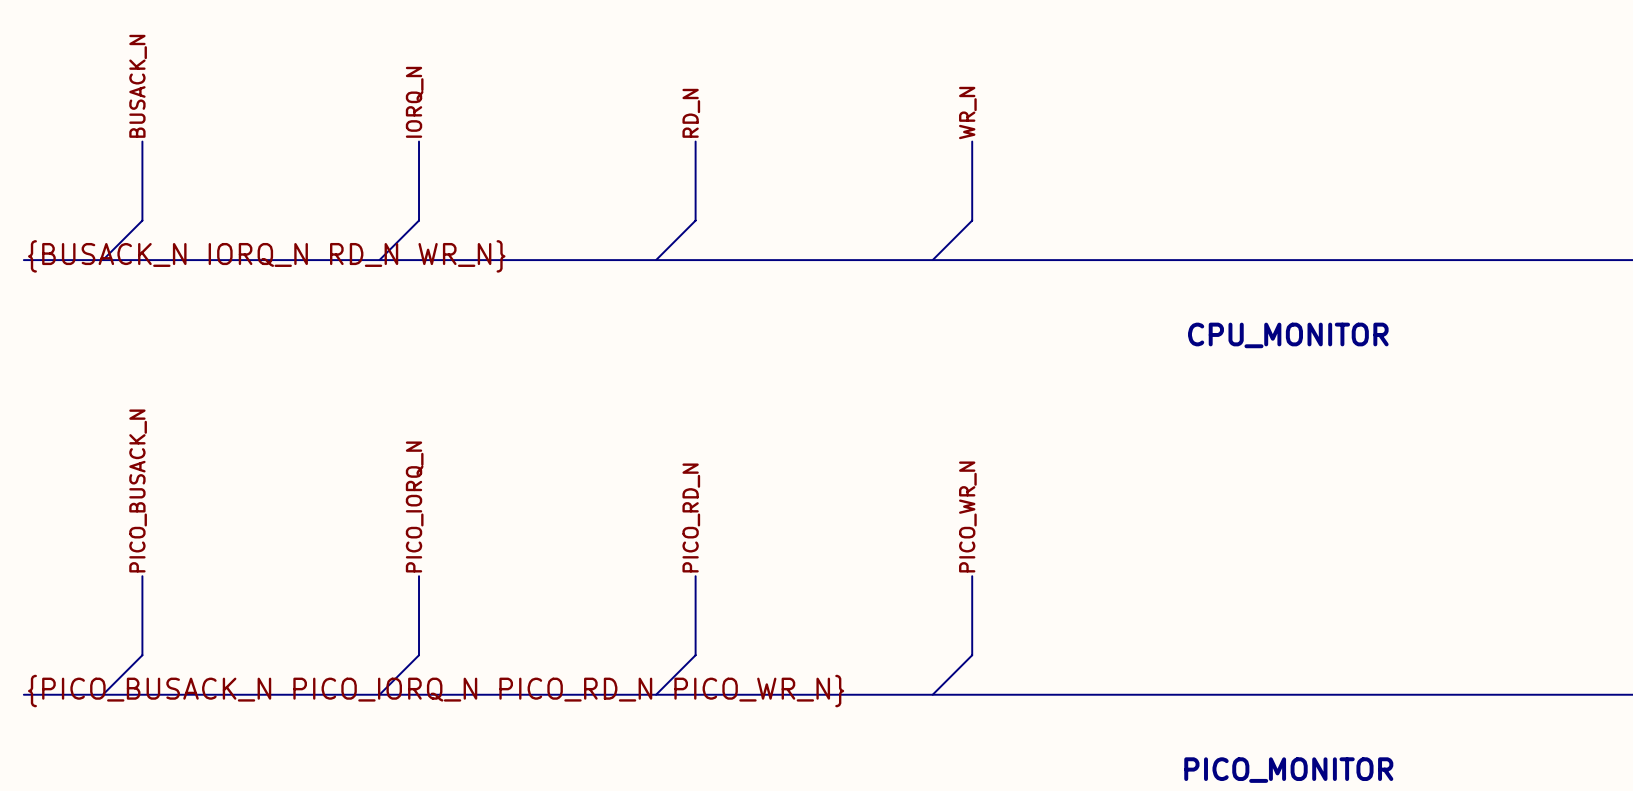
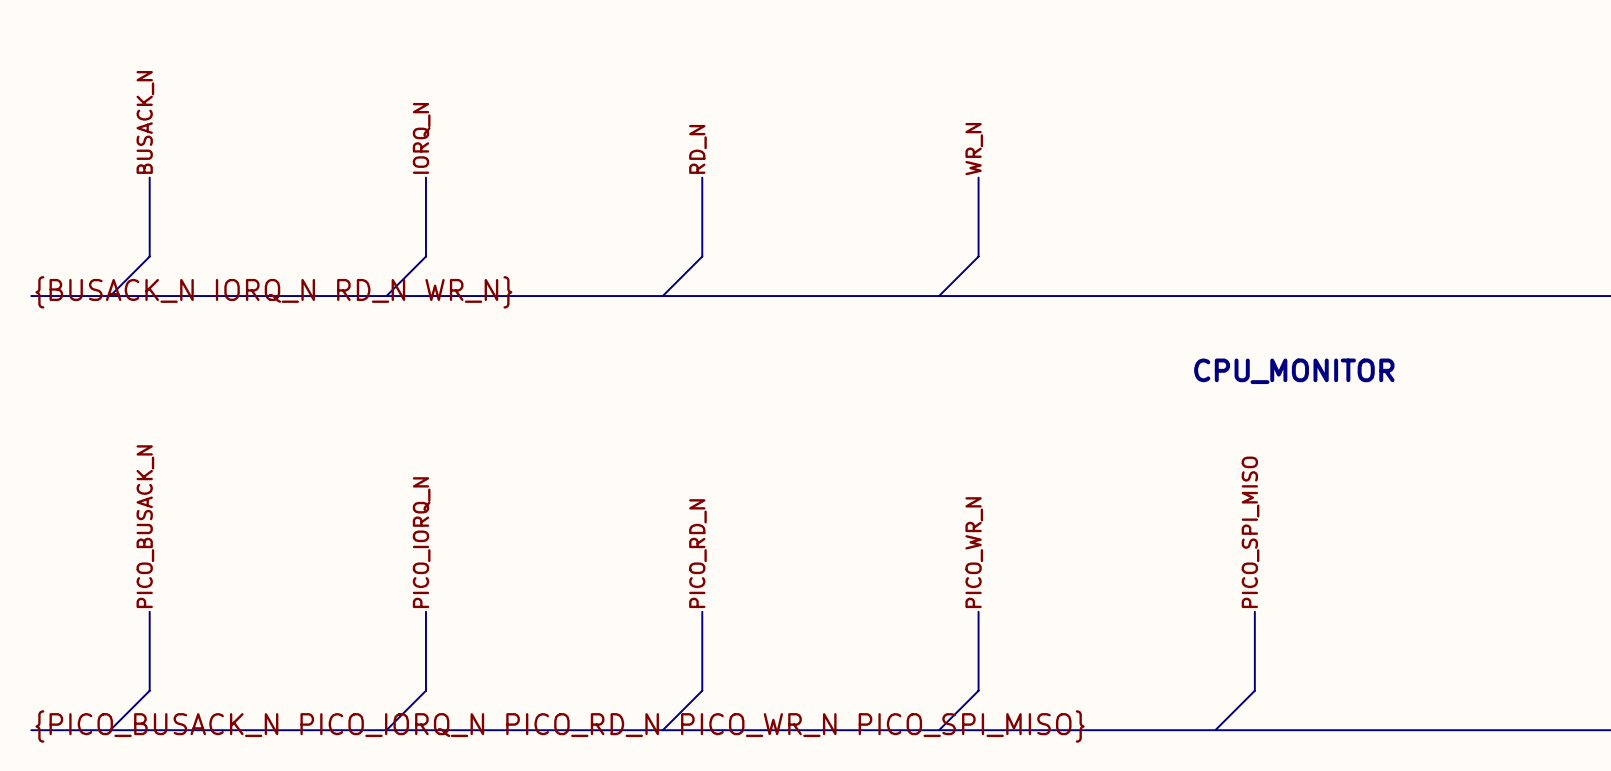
label: none -> PICO_SPI_MISO (1250, 532)
wire: none -> (1254, 611) (1254, 690) (1215, 730)
label: {PICO_BUSACK_N PICO_IORQ_N PICO_RD_N PICO_WR_N} (436, 691) -> {PICO_BUSACK_N PICO_IORQ_N PICO_RD_N PICO_WR_N PICO_SPI_MISO} (560, 726)

